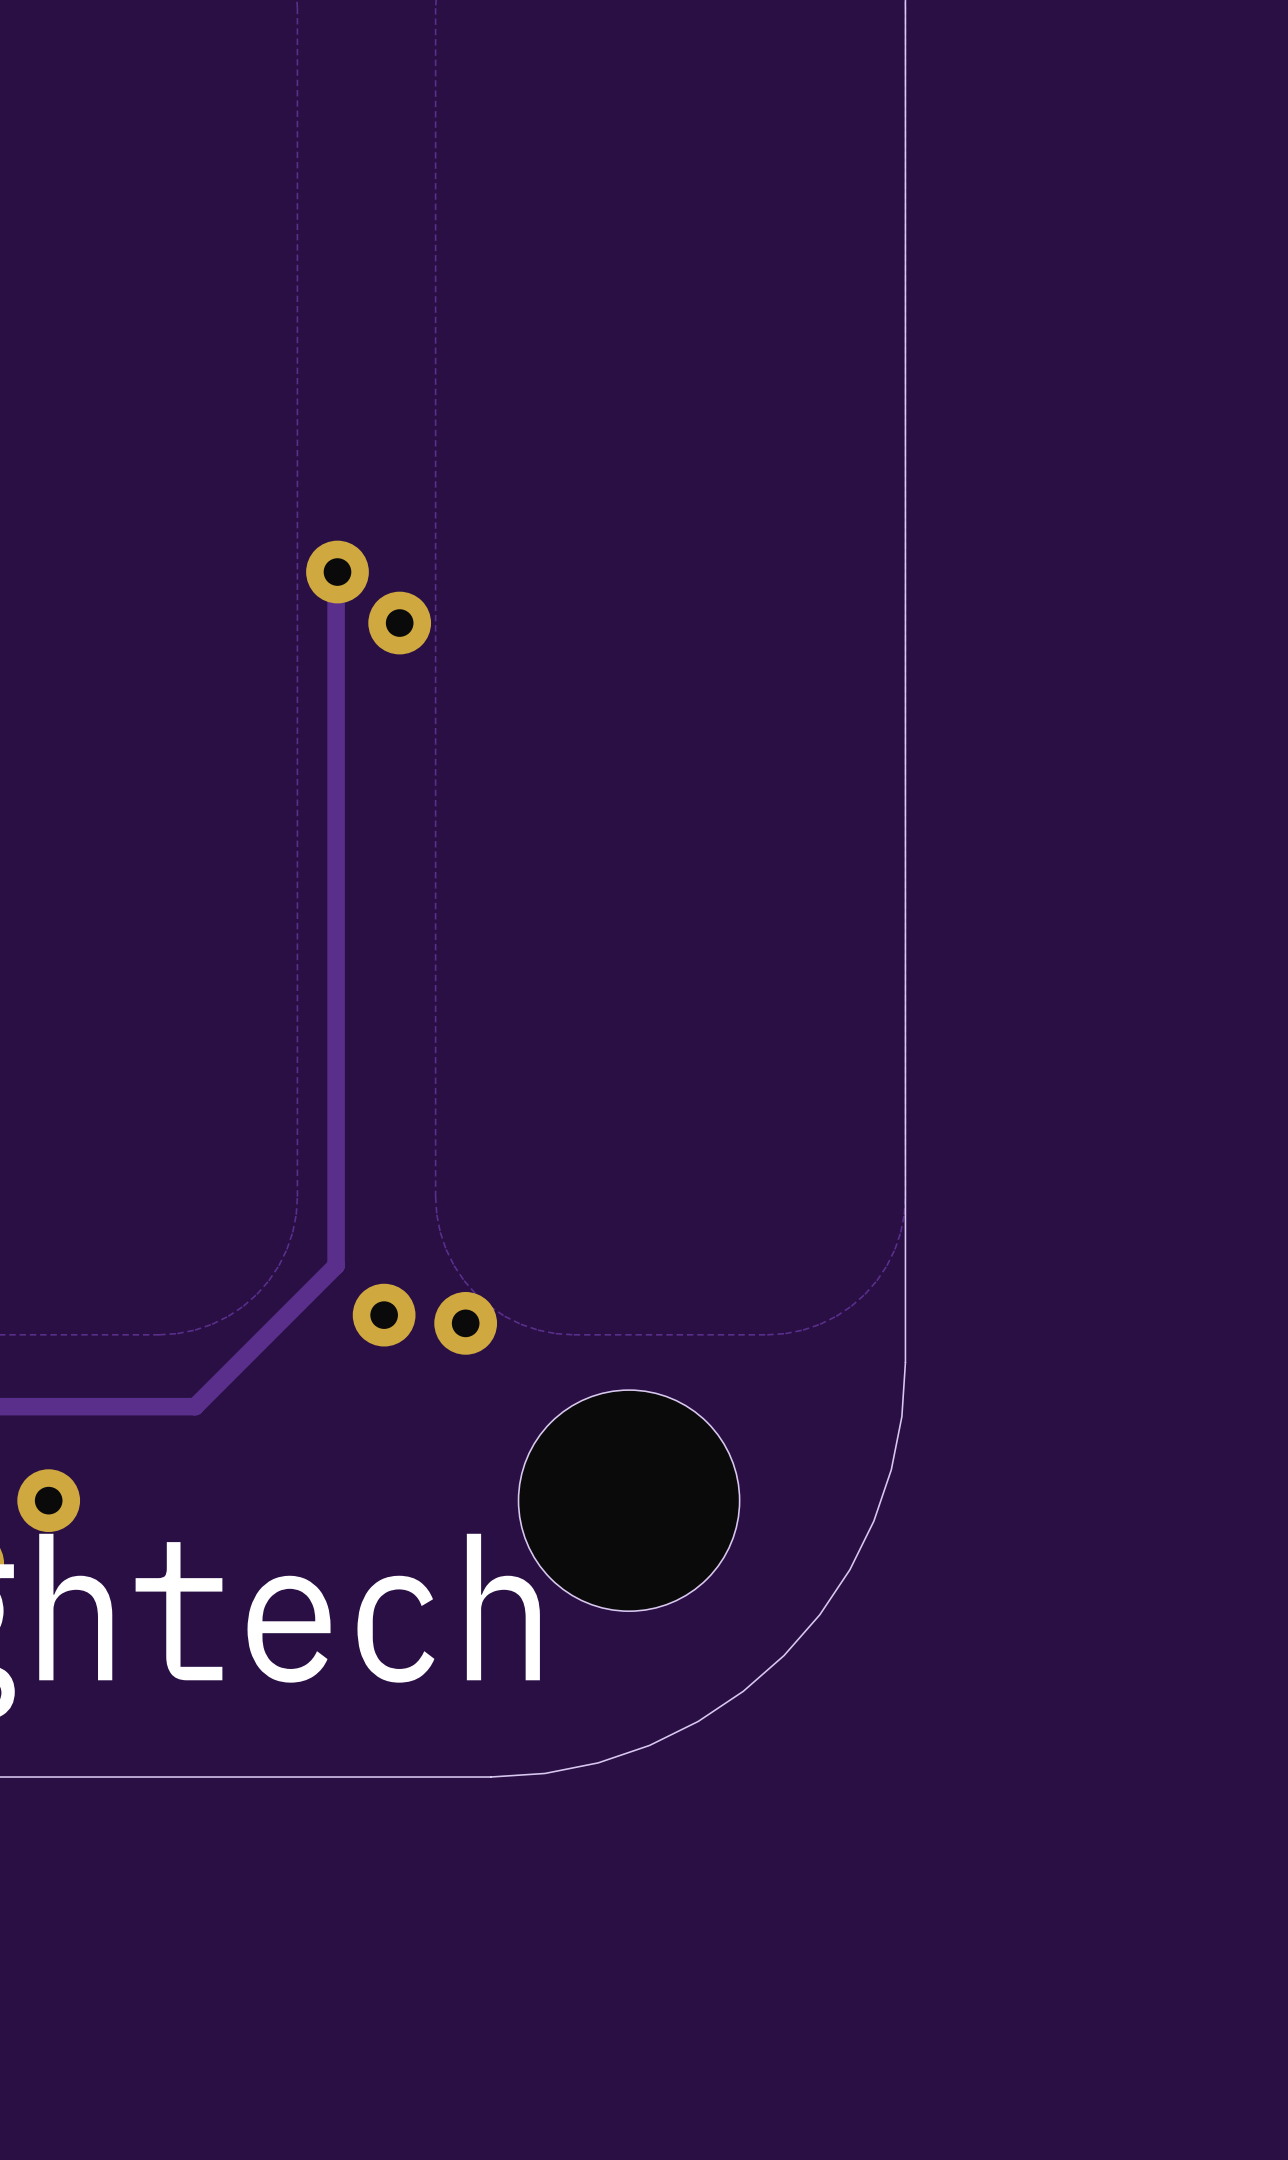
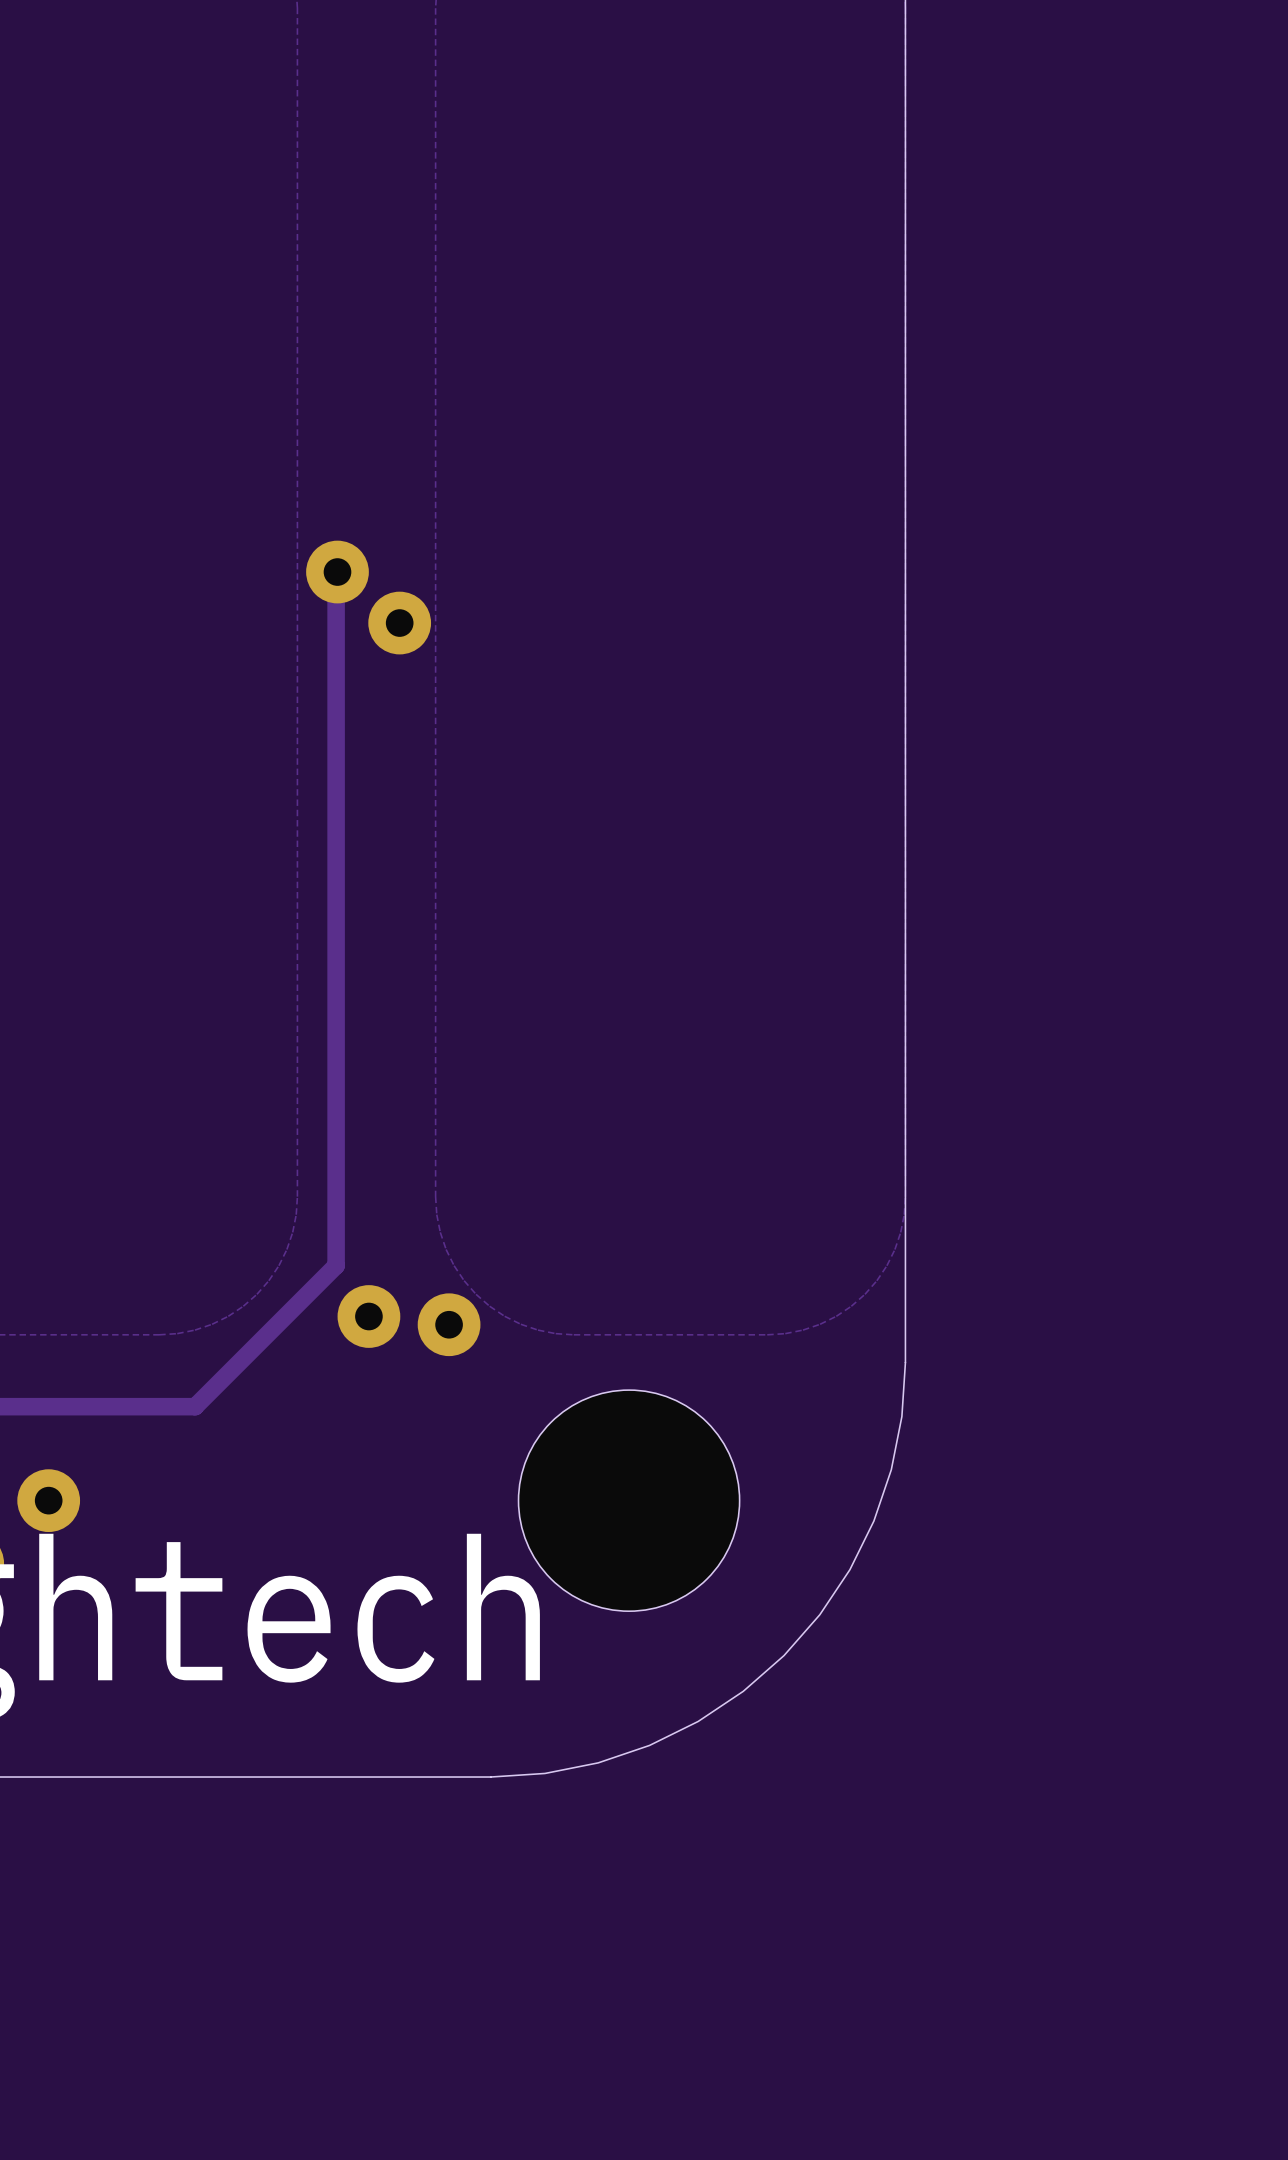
via position: (384, 1315) -> (368, 1316)
via position: (465, 1323) -> (449, 1324)

